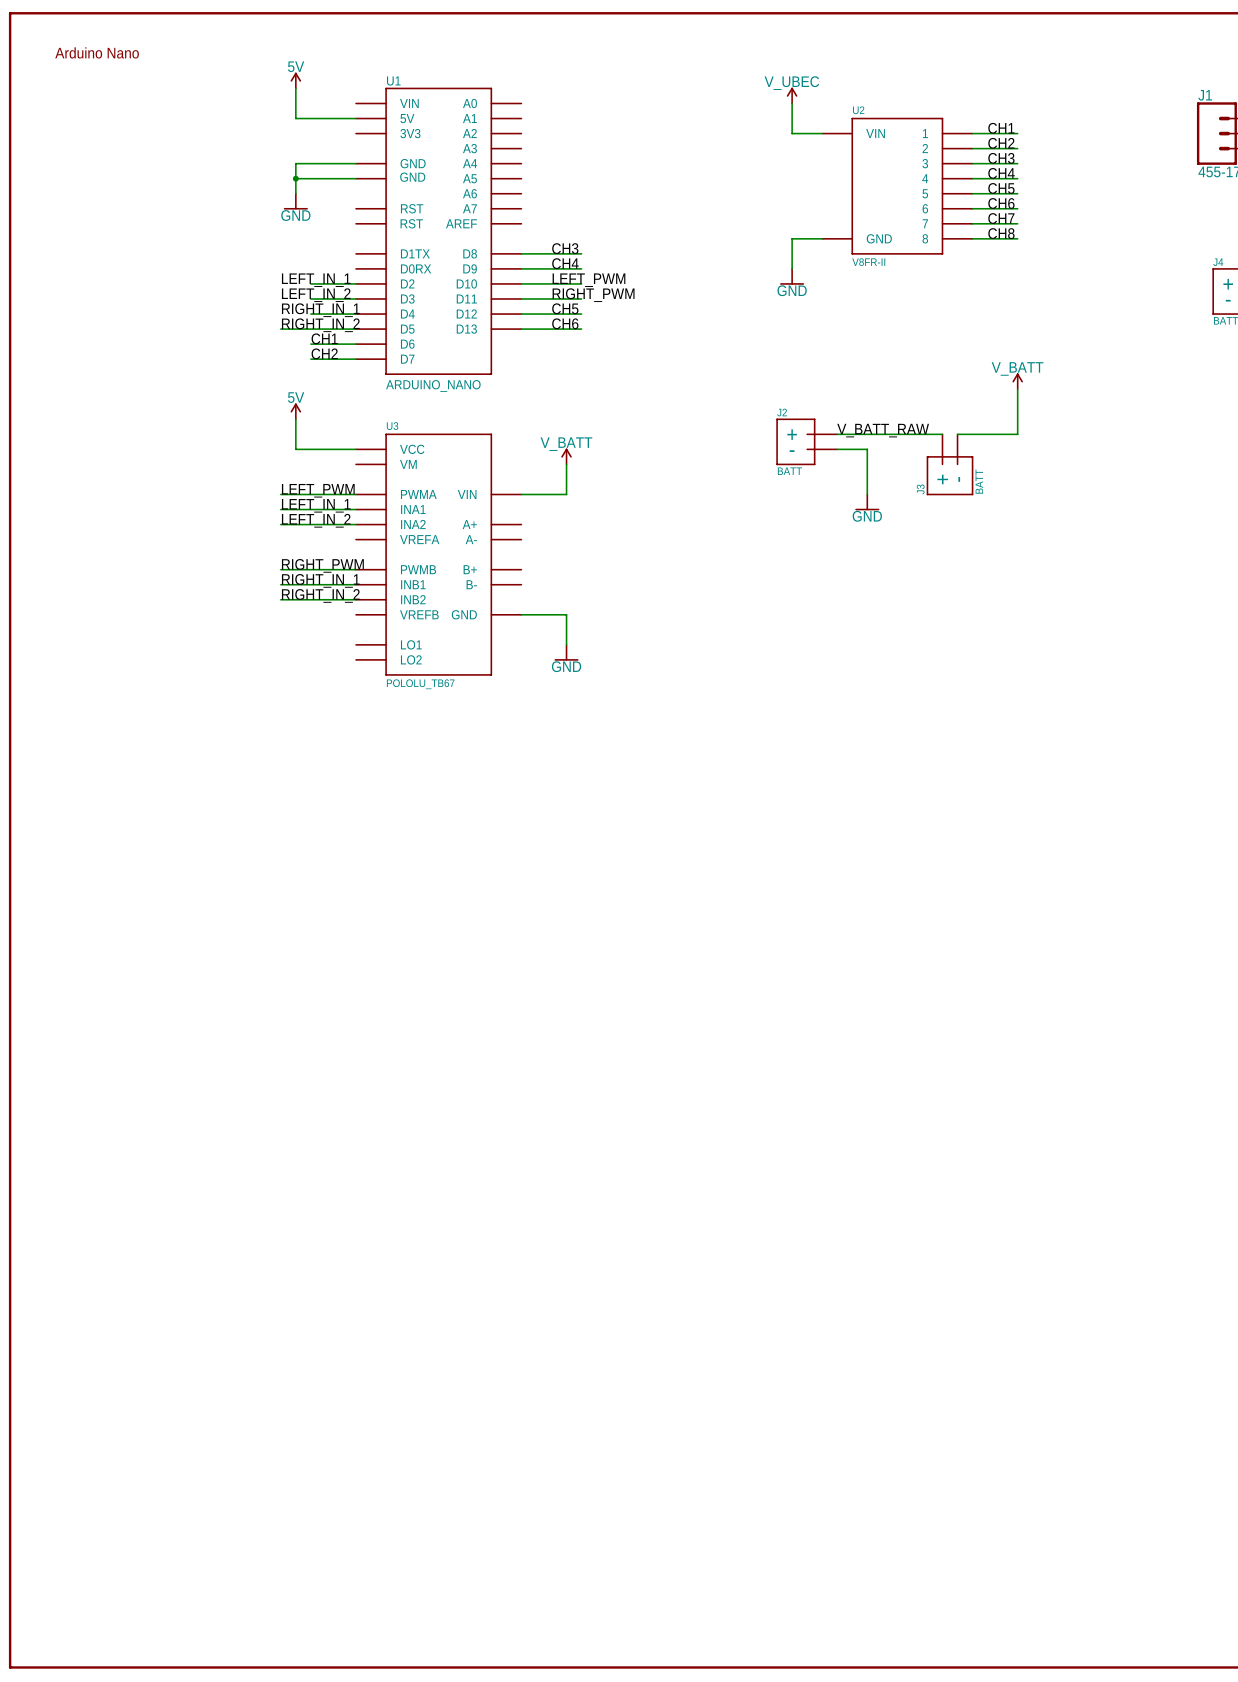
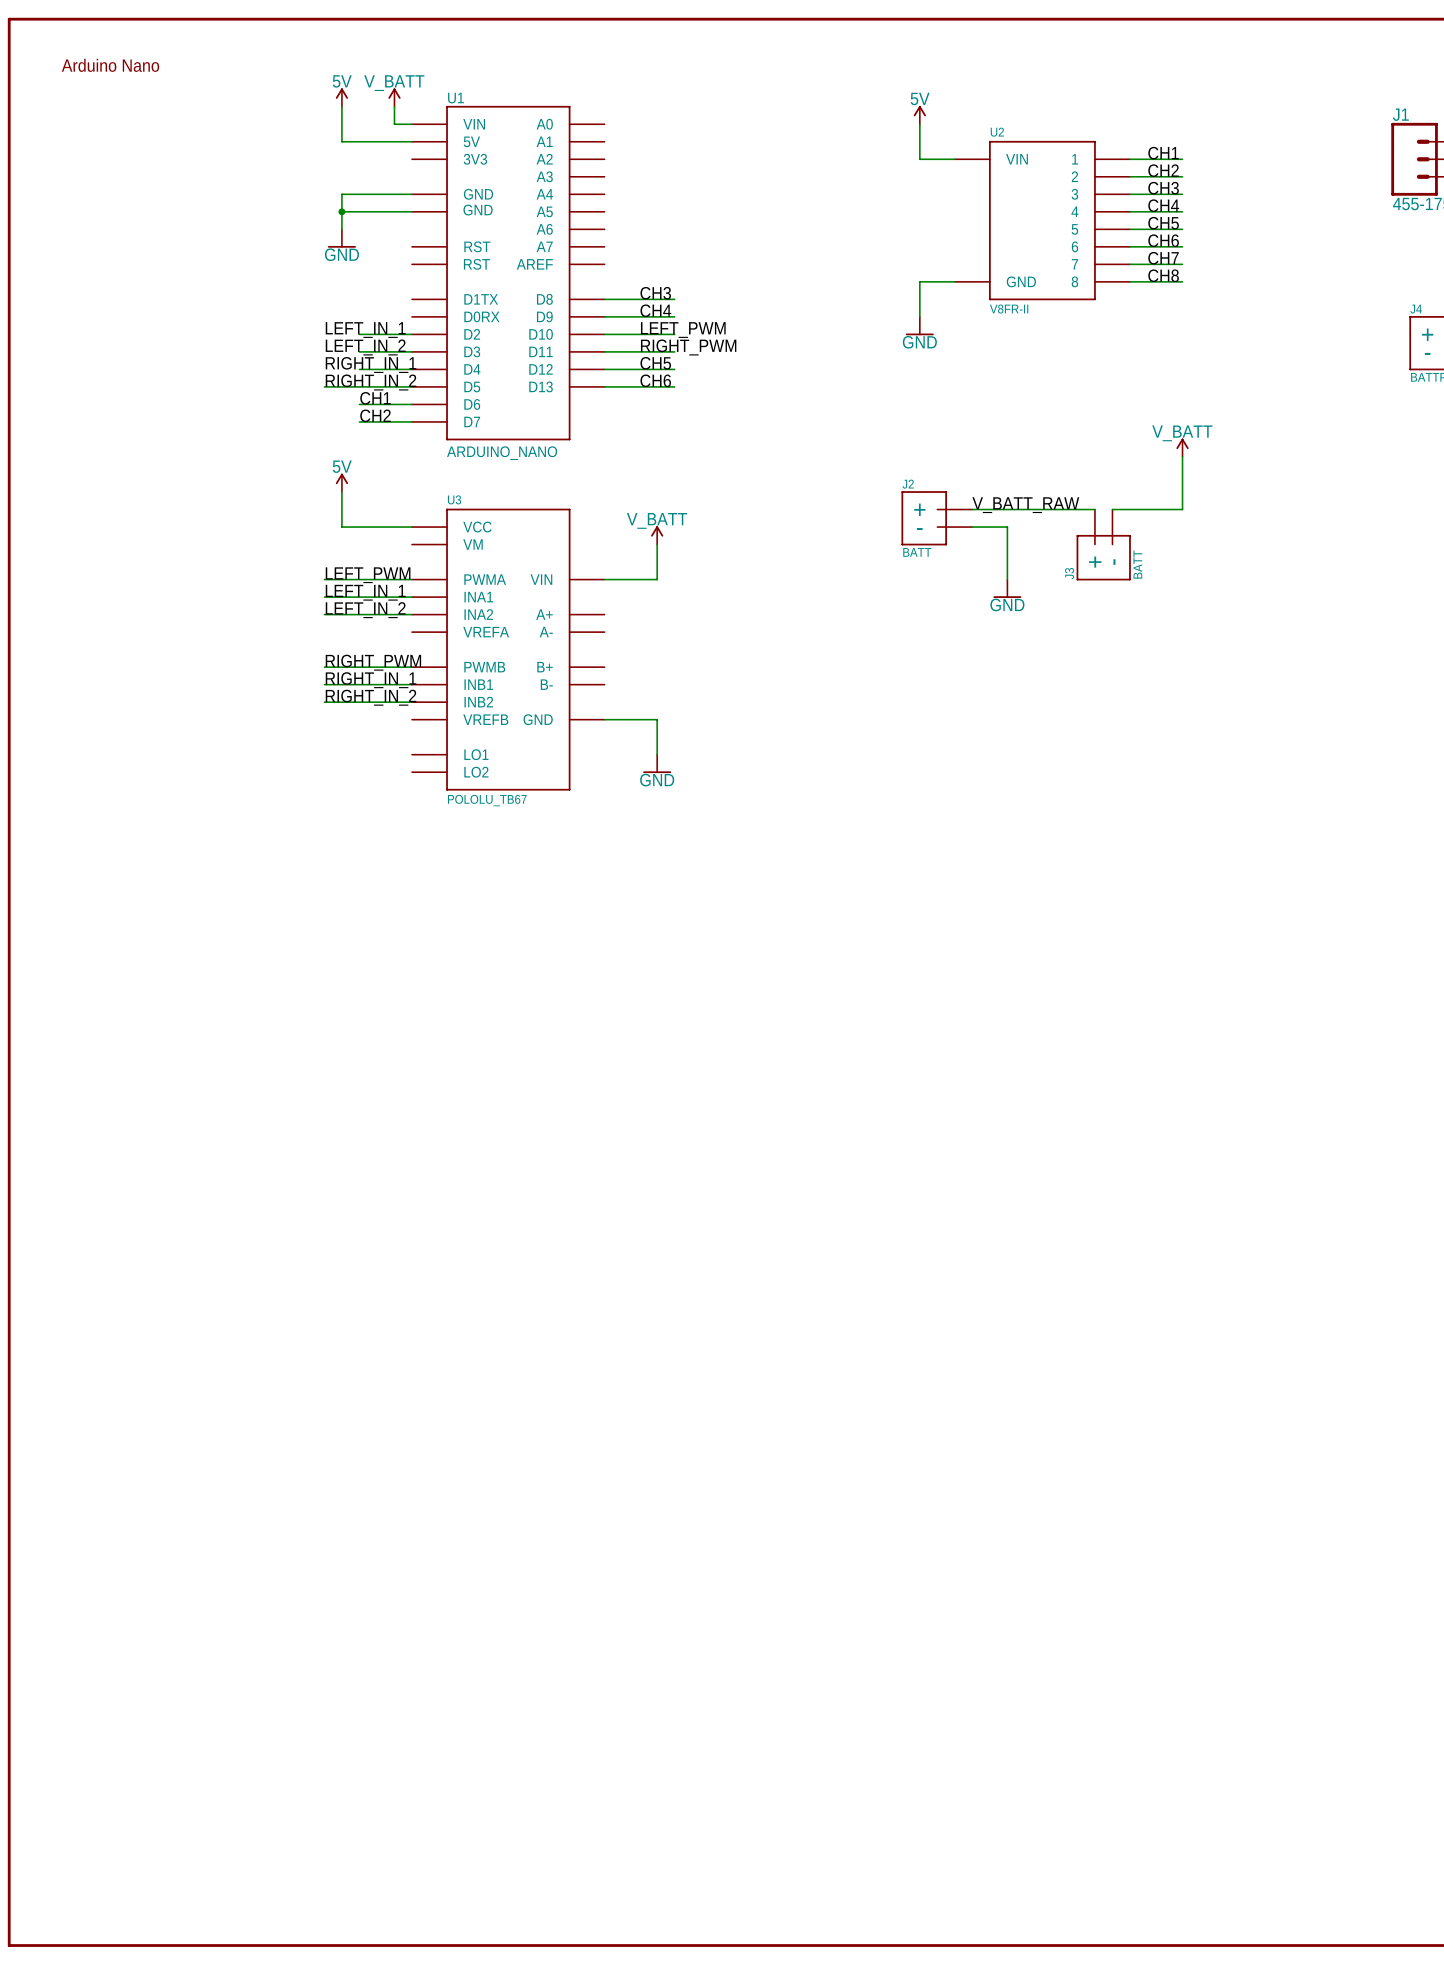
power symbol: none -> V_BATT (394, 97)
wire: none -> (394, 106) (394, 124) (411, 124)
power symbol: V_UBEC (792, 95) -> 5V (919, 115)

